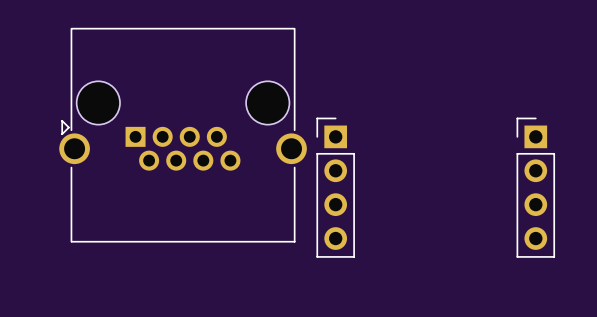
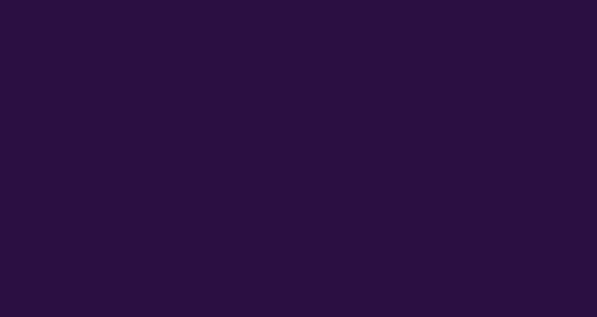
part: (183, 135) -> none
part: (335, 187) -> none
part: (535, 187) -> none

